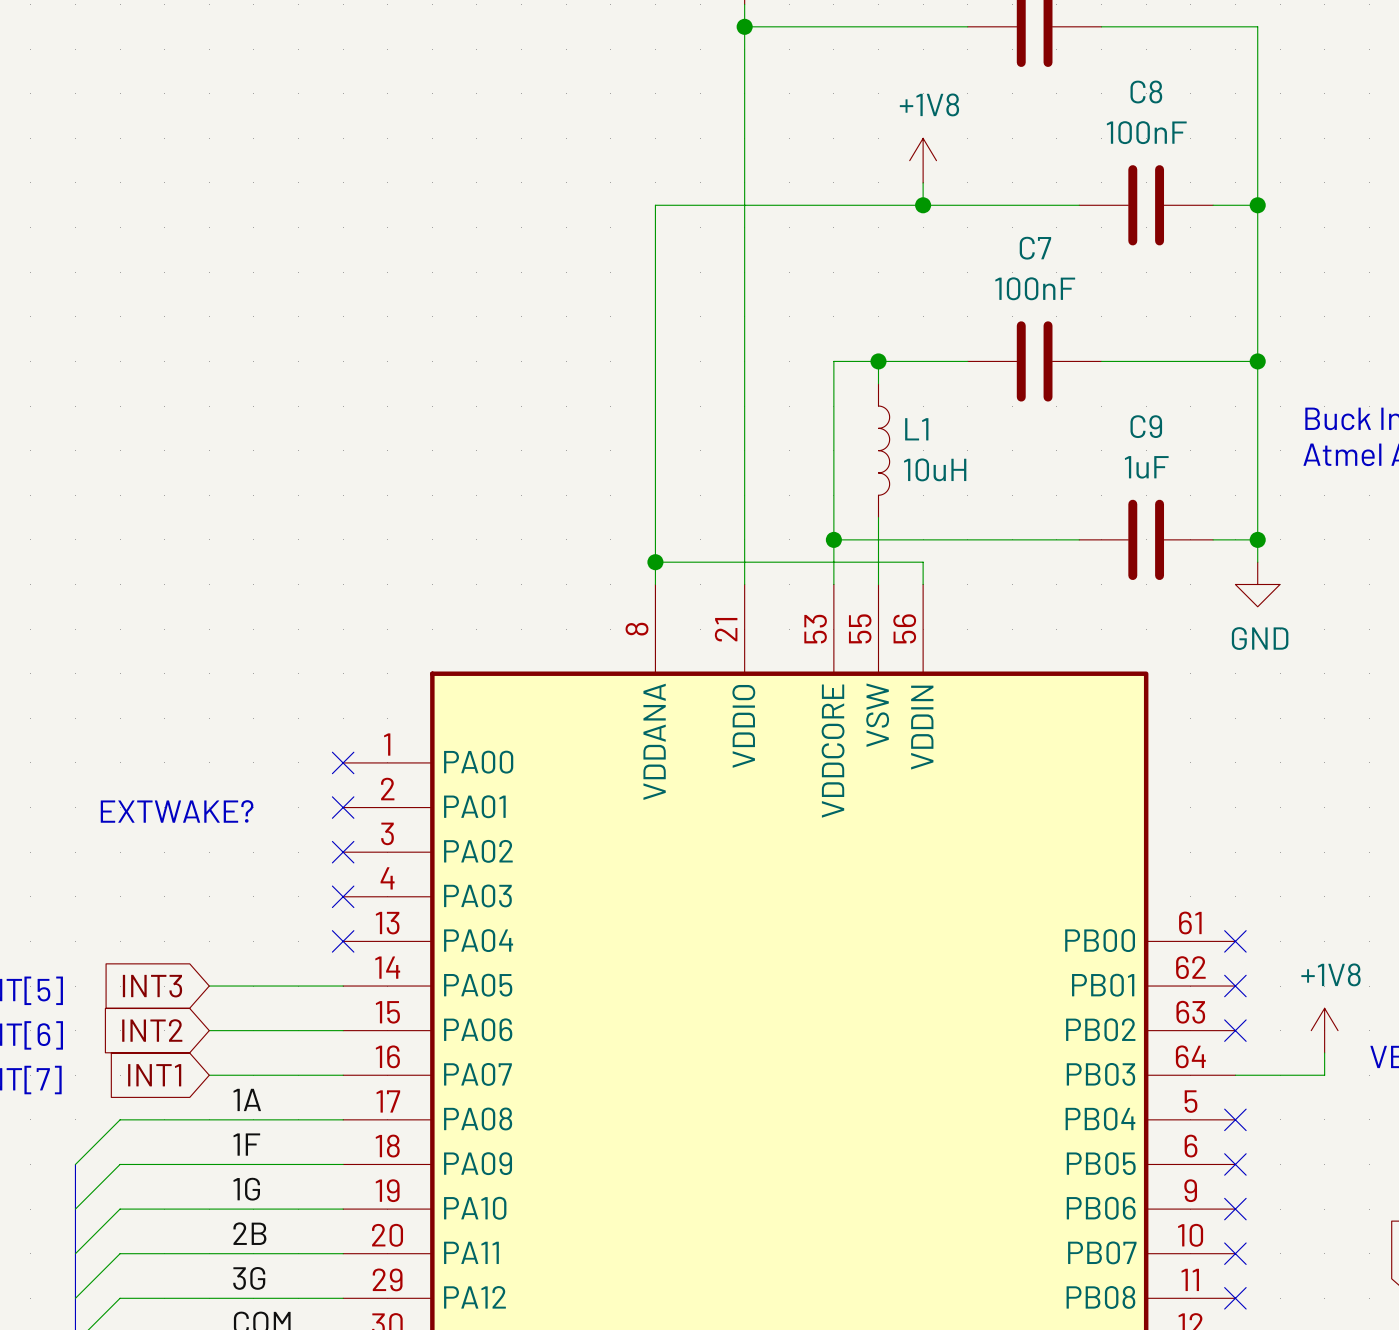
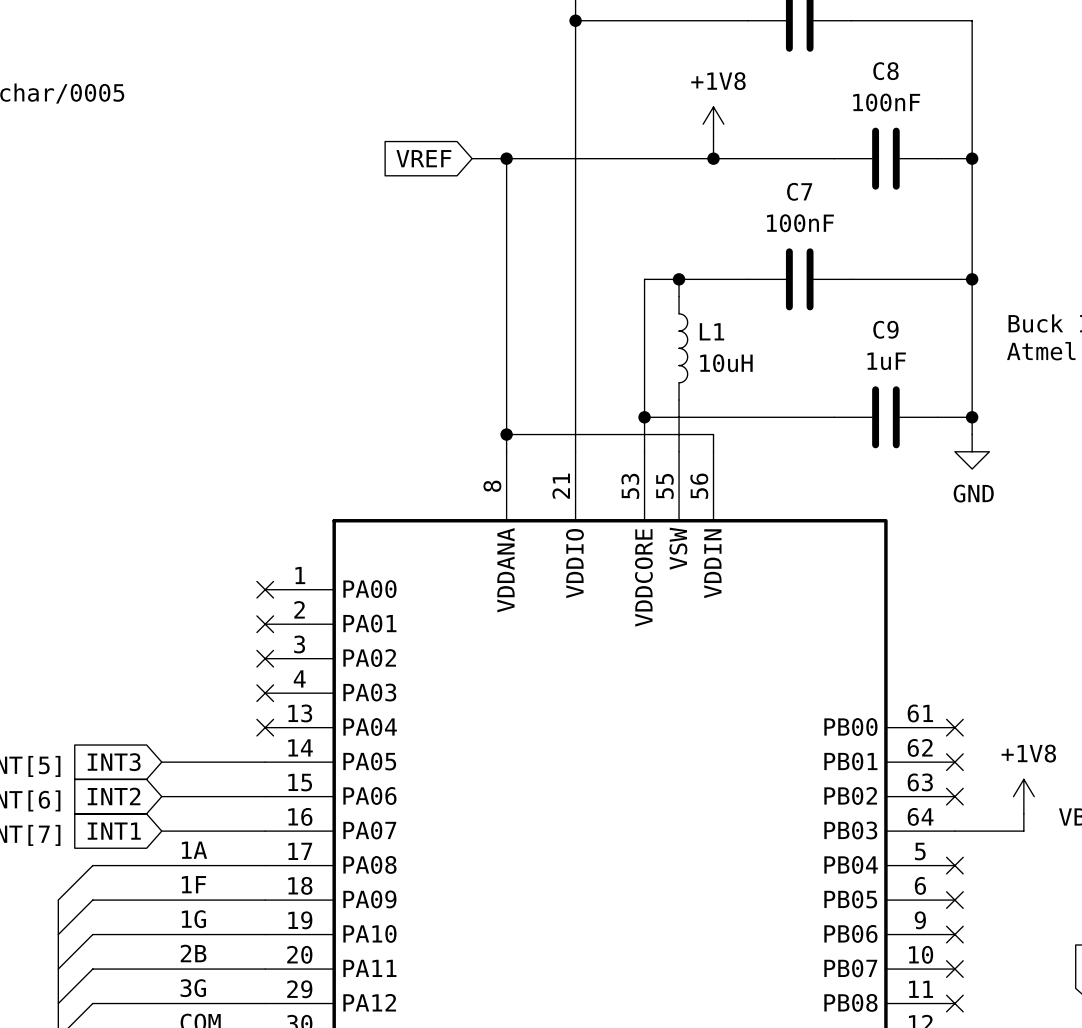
global label: none -> VREF (423, 158)
wire: none -> (472, 158) (506, 158)
junction: none -> (506, 158)
text: EXTWAKE? (177, 811) -> none

